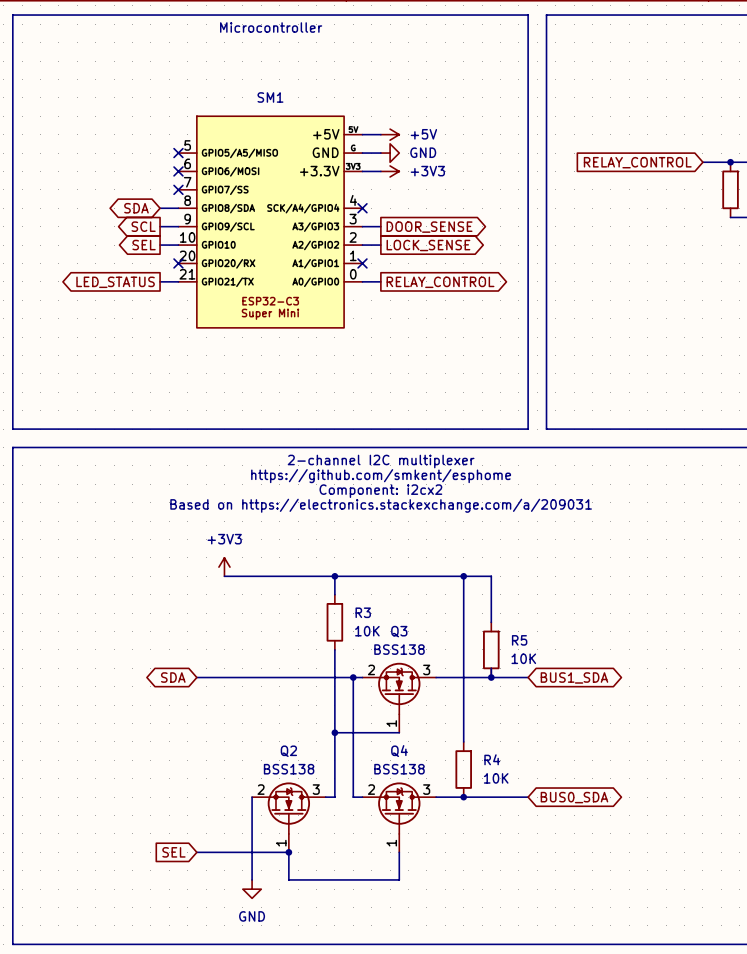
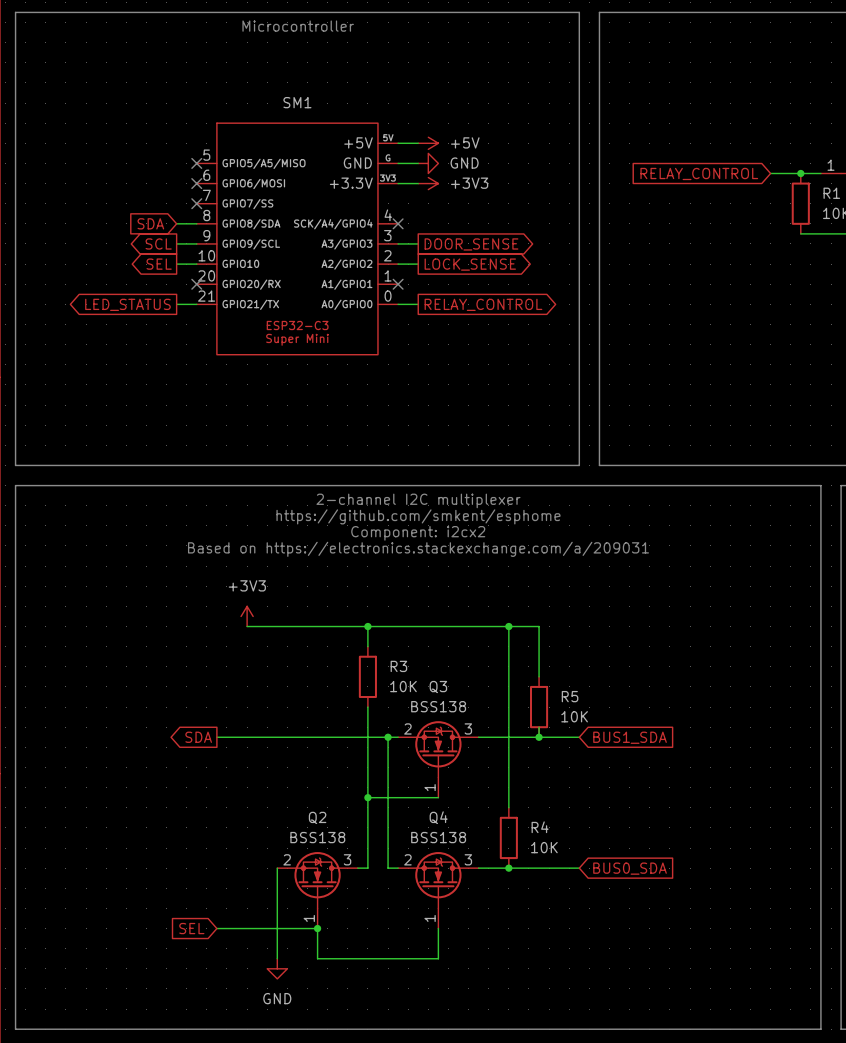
global label shape: bidirectional (136, 208) -> input (150, 223)
global label shape: bidirectional (173, 677) -> output (198, 737)
global label shape: bidirectional (574, 677) -> input (630, 737)
global label shape: bidirectional (574, 797) -> input (630, 868)

